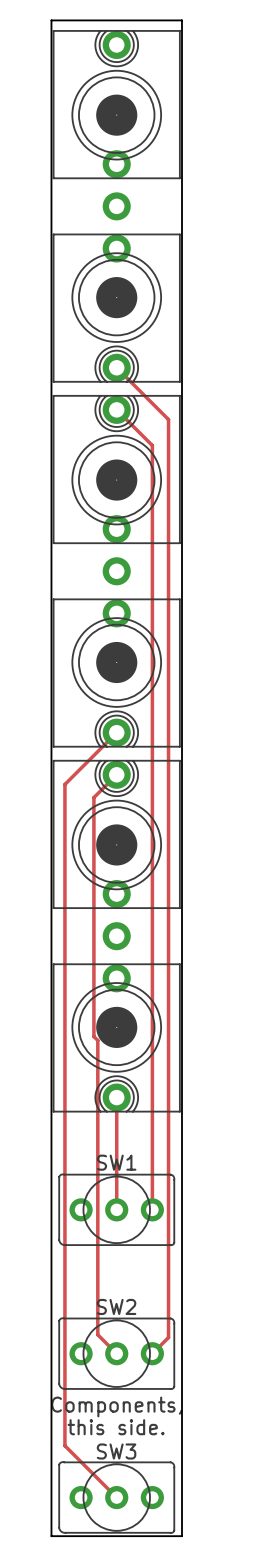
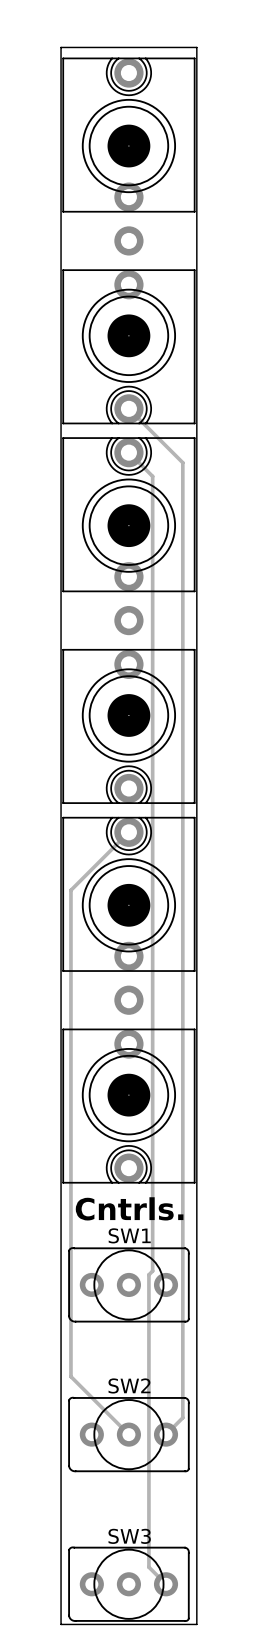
track: (139, 432) (152, 445) (152, 1209) -> (152, 476) (152, 1271) (148, 1274) (148, 1567) (166, 1584)
track: (116, 732) (64, 784) (64, 1445) (116, 1497) -> none
track: (93, 797) (93, 1036) (97, 1040) (97, 1334) -> (105, 856) (70, 890) (70, 1376) (109, 1414)
track: (116, 1097) (116, 1209) -> none
text: none -> Cntrls. (129, 1208)
text: Components, (116, 1406) -> none
text: this side. (116, 1427) -> none

